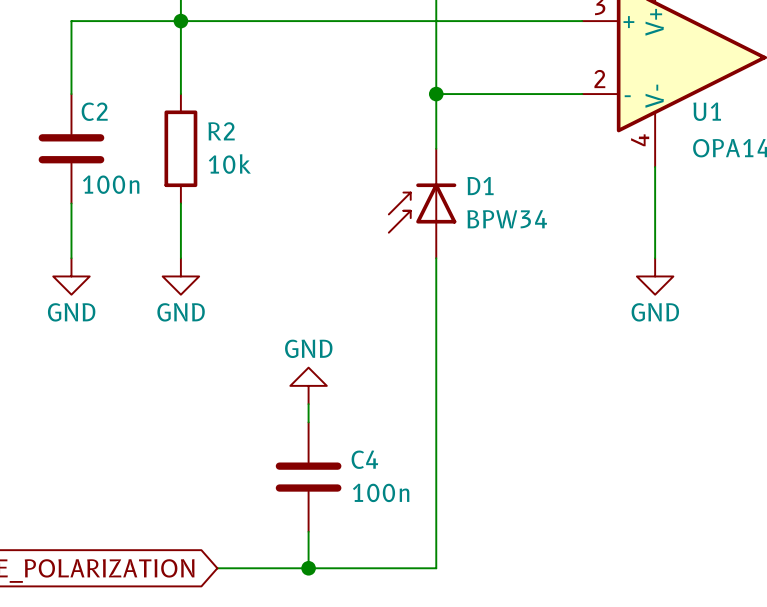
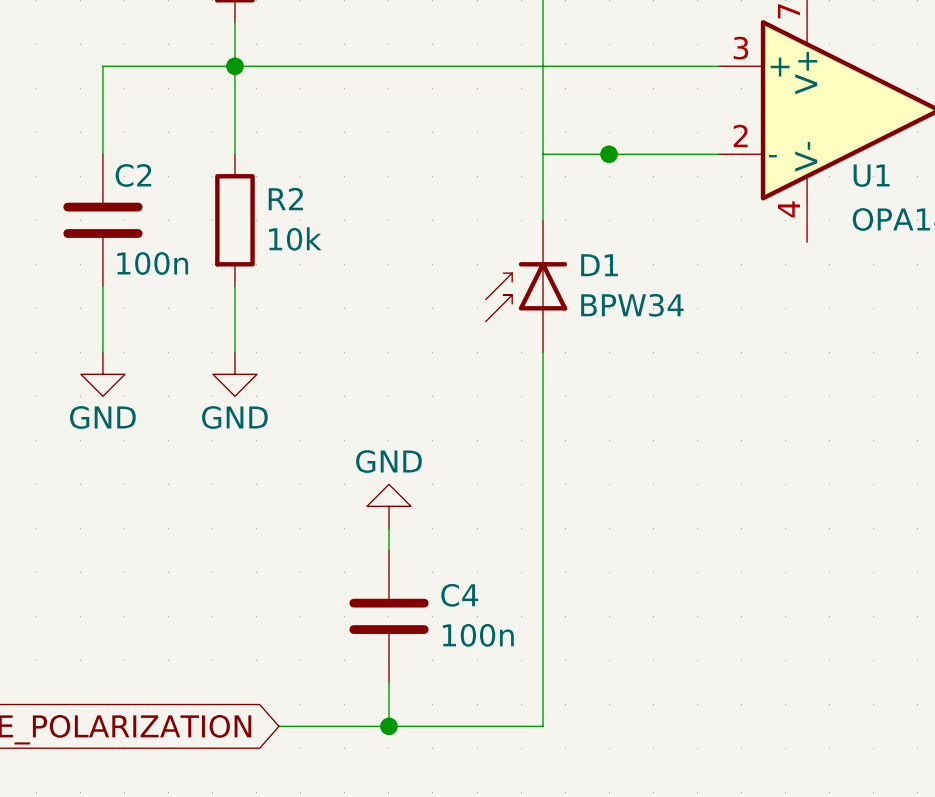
junction position: (436, 94) -> (609, 154)
wire: (655, 167) (655, 258) -> none
power symbol: GND (655, 276) -> none

